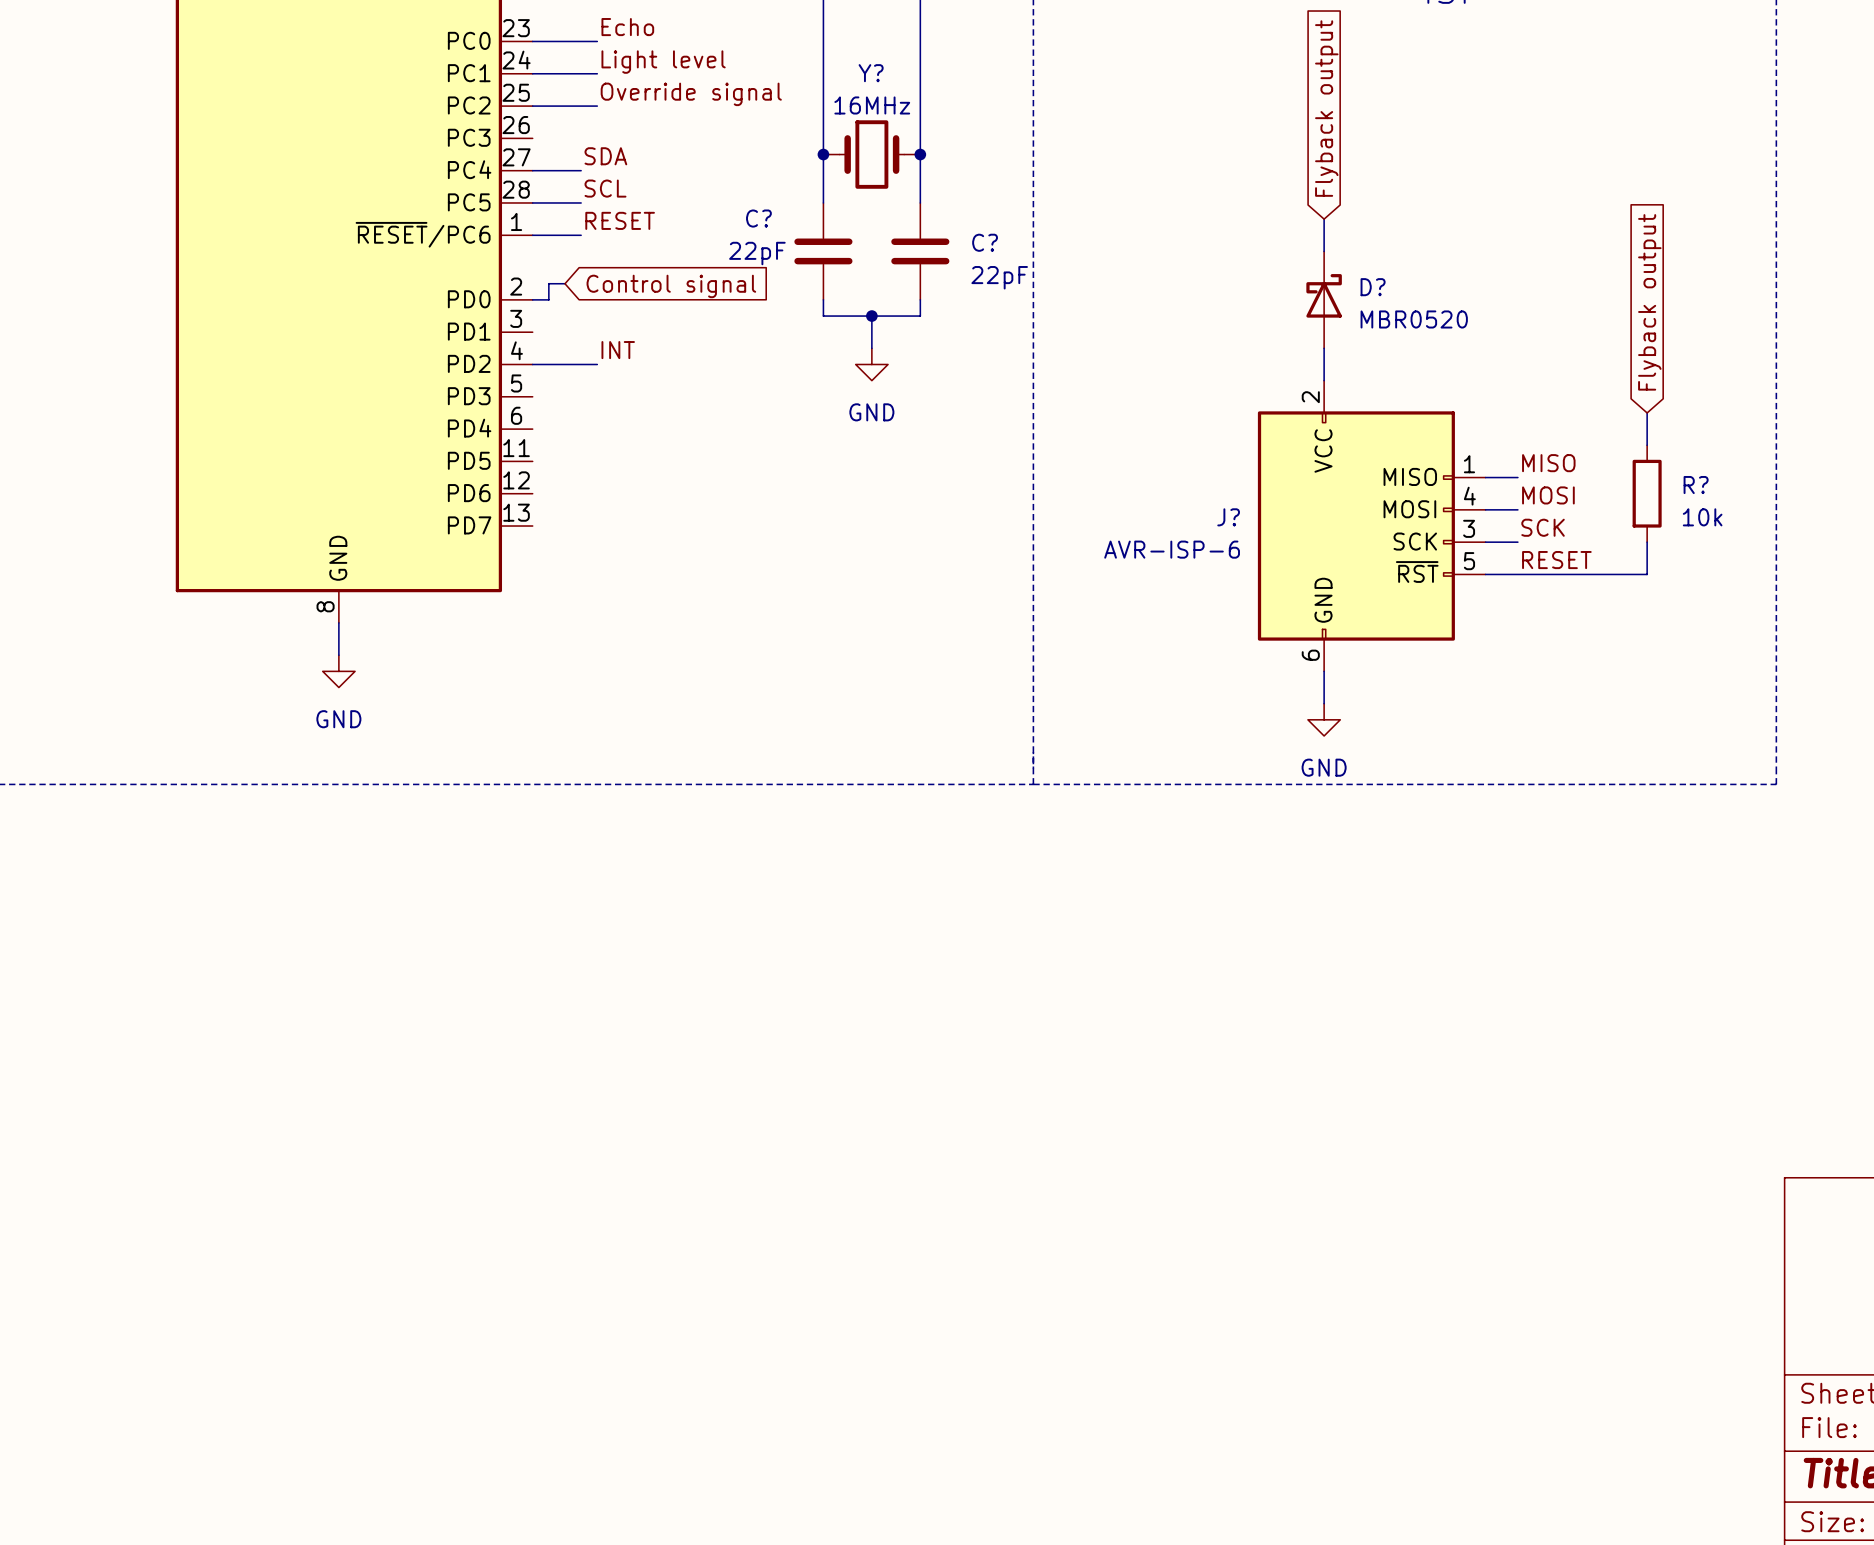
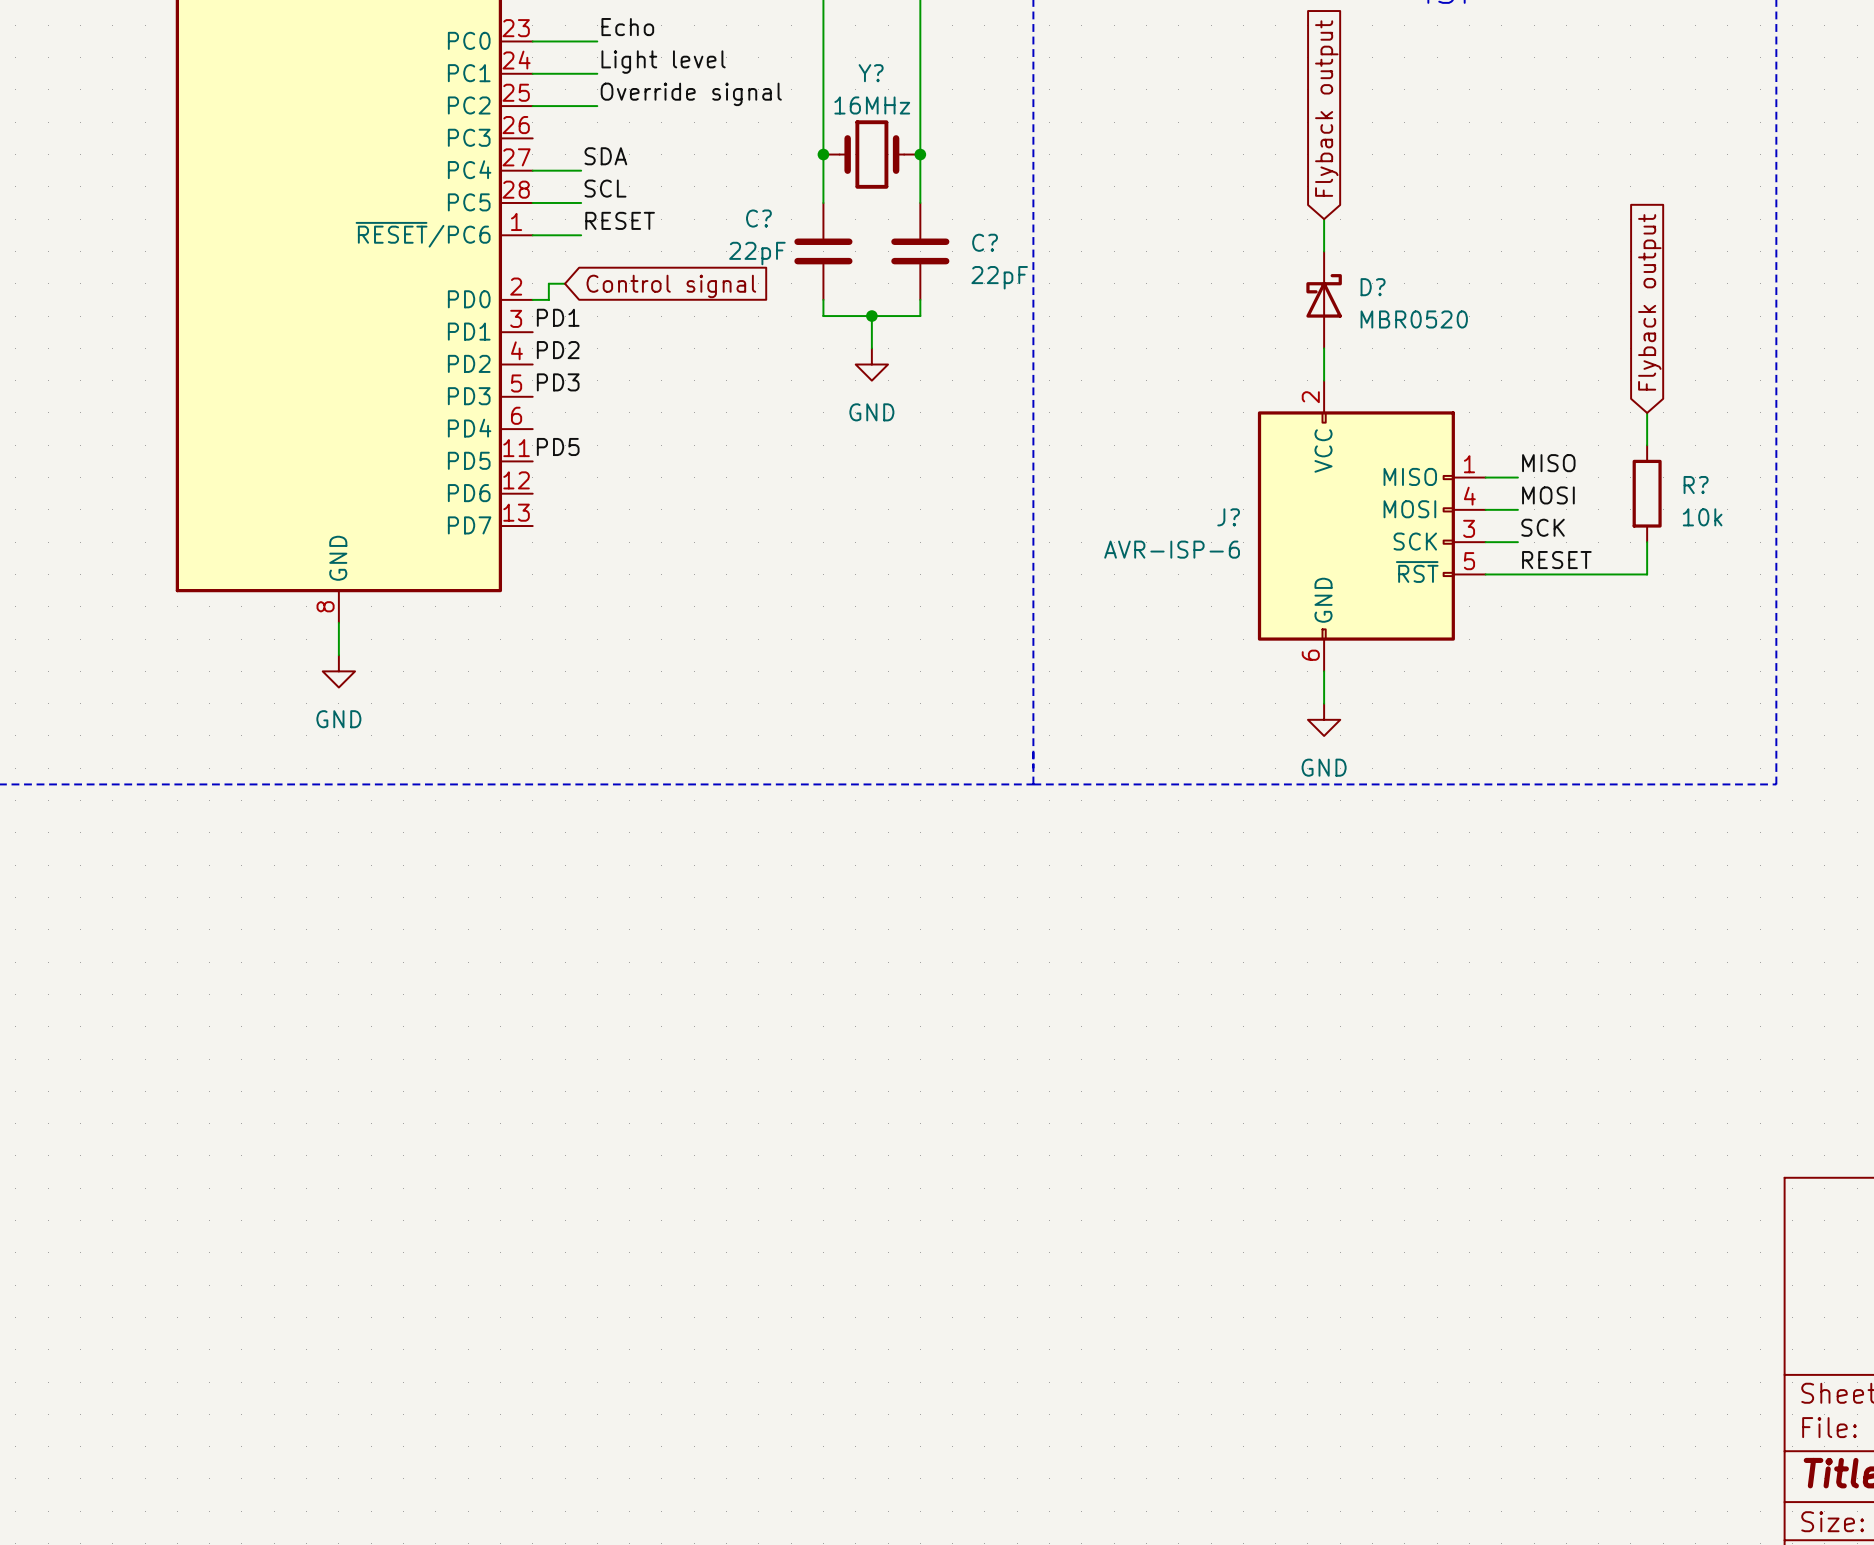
label: none -> PD1 (558, 317)
label: none -> PD2 (558, 350)
label: INT (618, 350) -> none
wire: (532, 364) (597, 364) -> none
label: none -> PD3 (558, 382)
label: none -> PD5 (558, 446)

